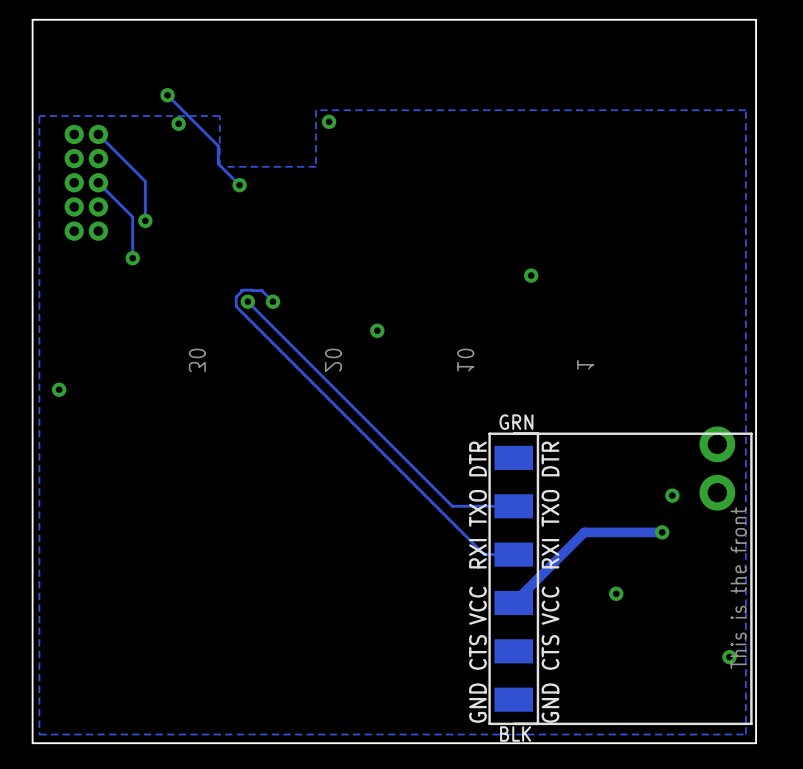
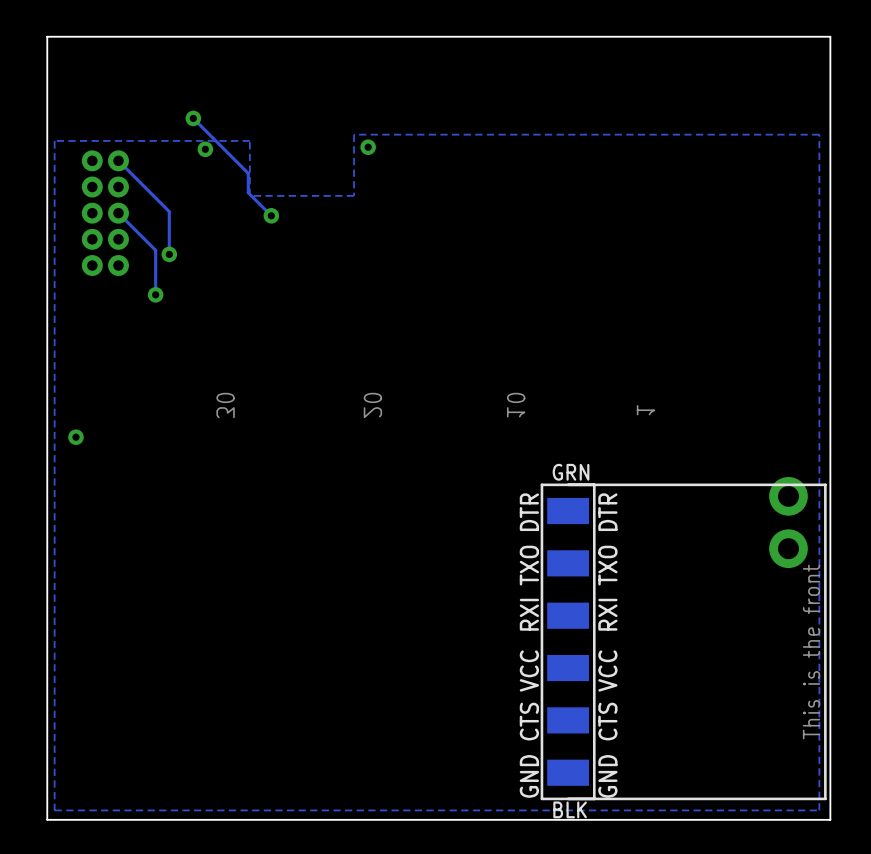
via: (531, 275) -> none
track: (247, 301) (452, 506) (513, 506) -> none
via: (247, 301) -> none
track: (272, 301) (261, 290) (243, 290) (236, 296) (236, 306) (484, 554) (513, 554) -> none
via: (272, 301) -> none
via: (377, 330) -> none
via: (672, 495) -> none
track: (662, 532) (584, 532) (513, 602) -> none
via: (662, 532) -> none
via: (616, 593) -> none
via: (729, 657) -> none

